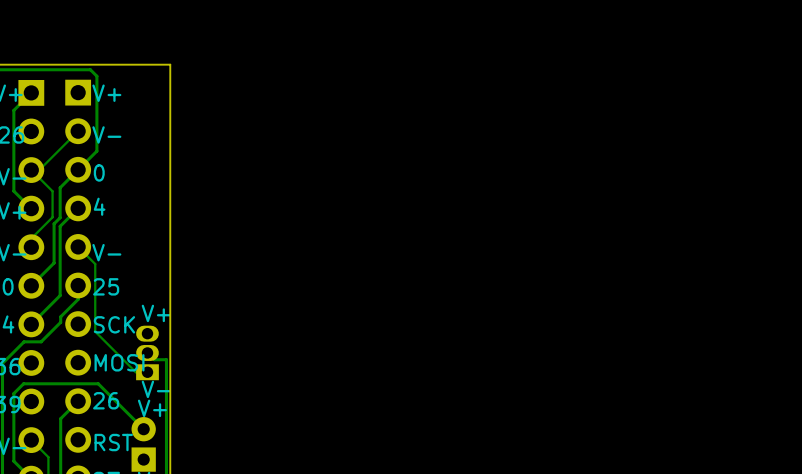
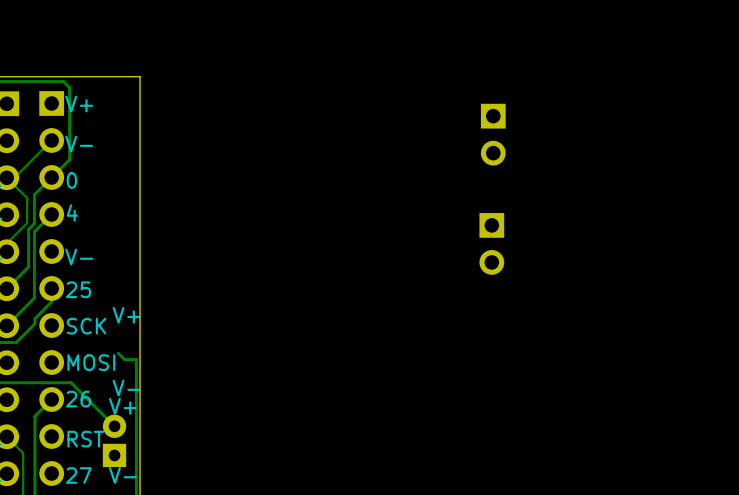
part: none -> (493, 134)
part: none -> (491, 243)
track: (78, 246) (95, 264) (95, 331) (135, 372) (147, 372) -> none
part: (147, 352) -> none

